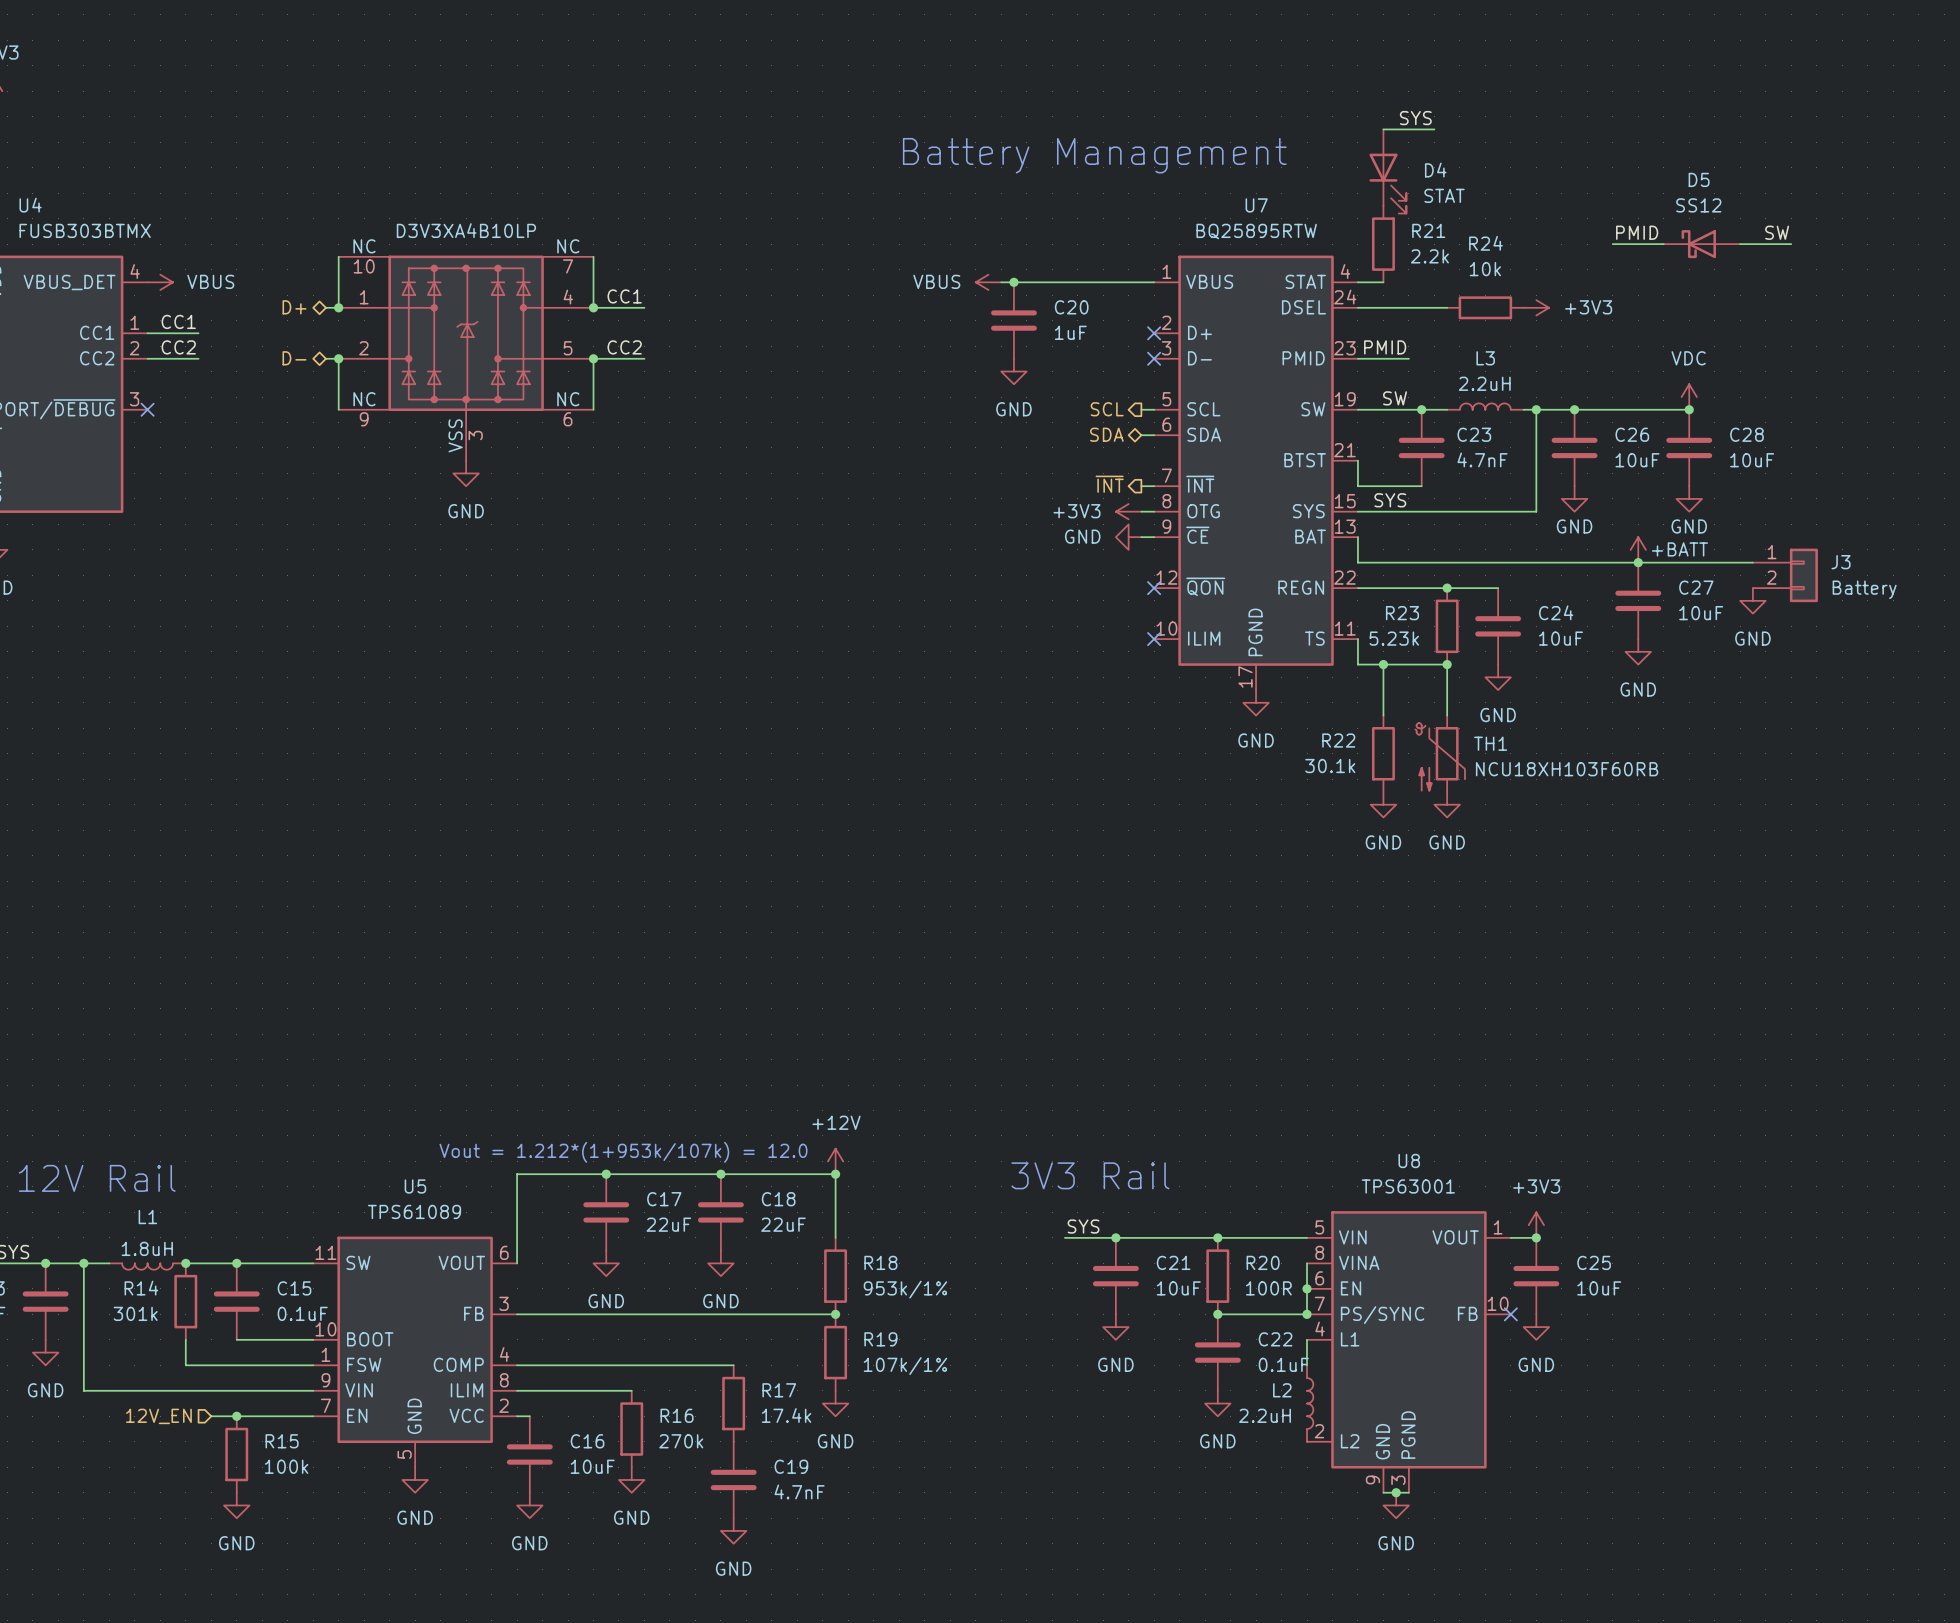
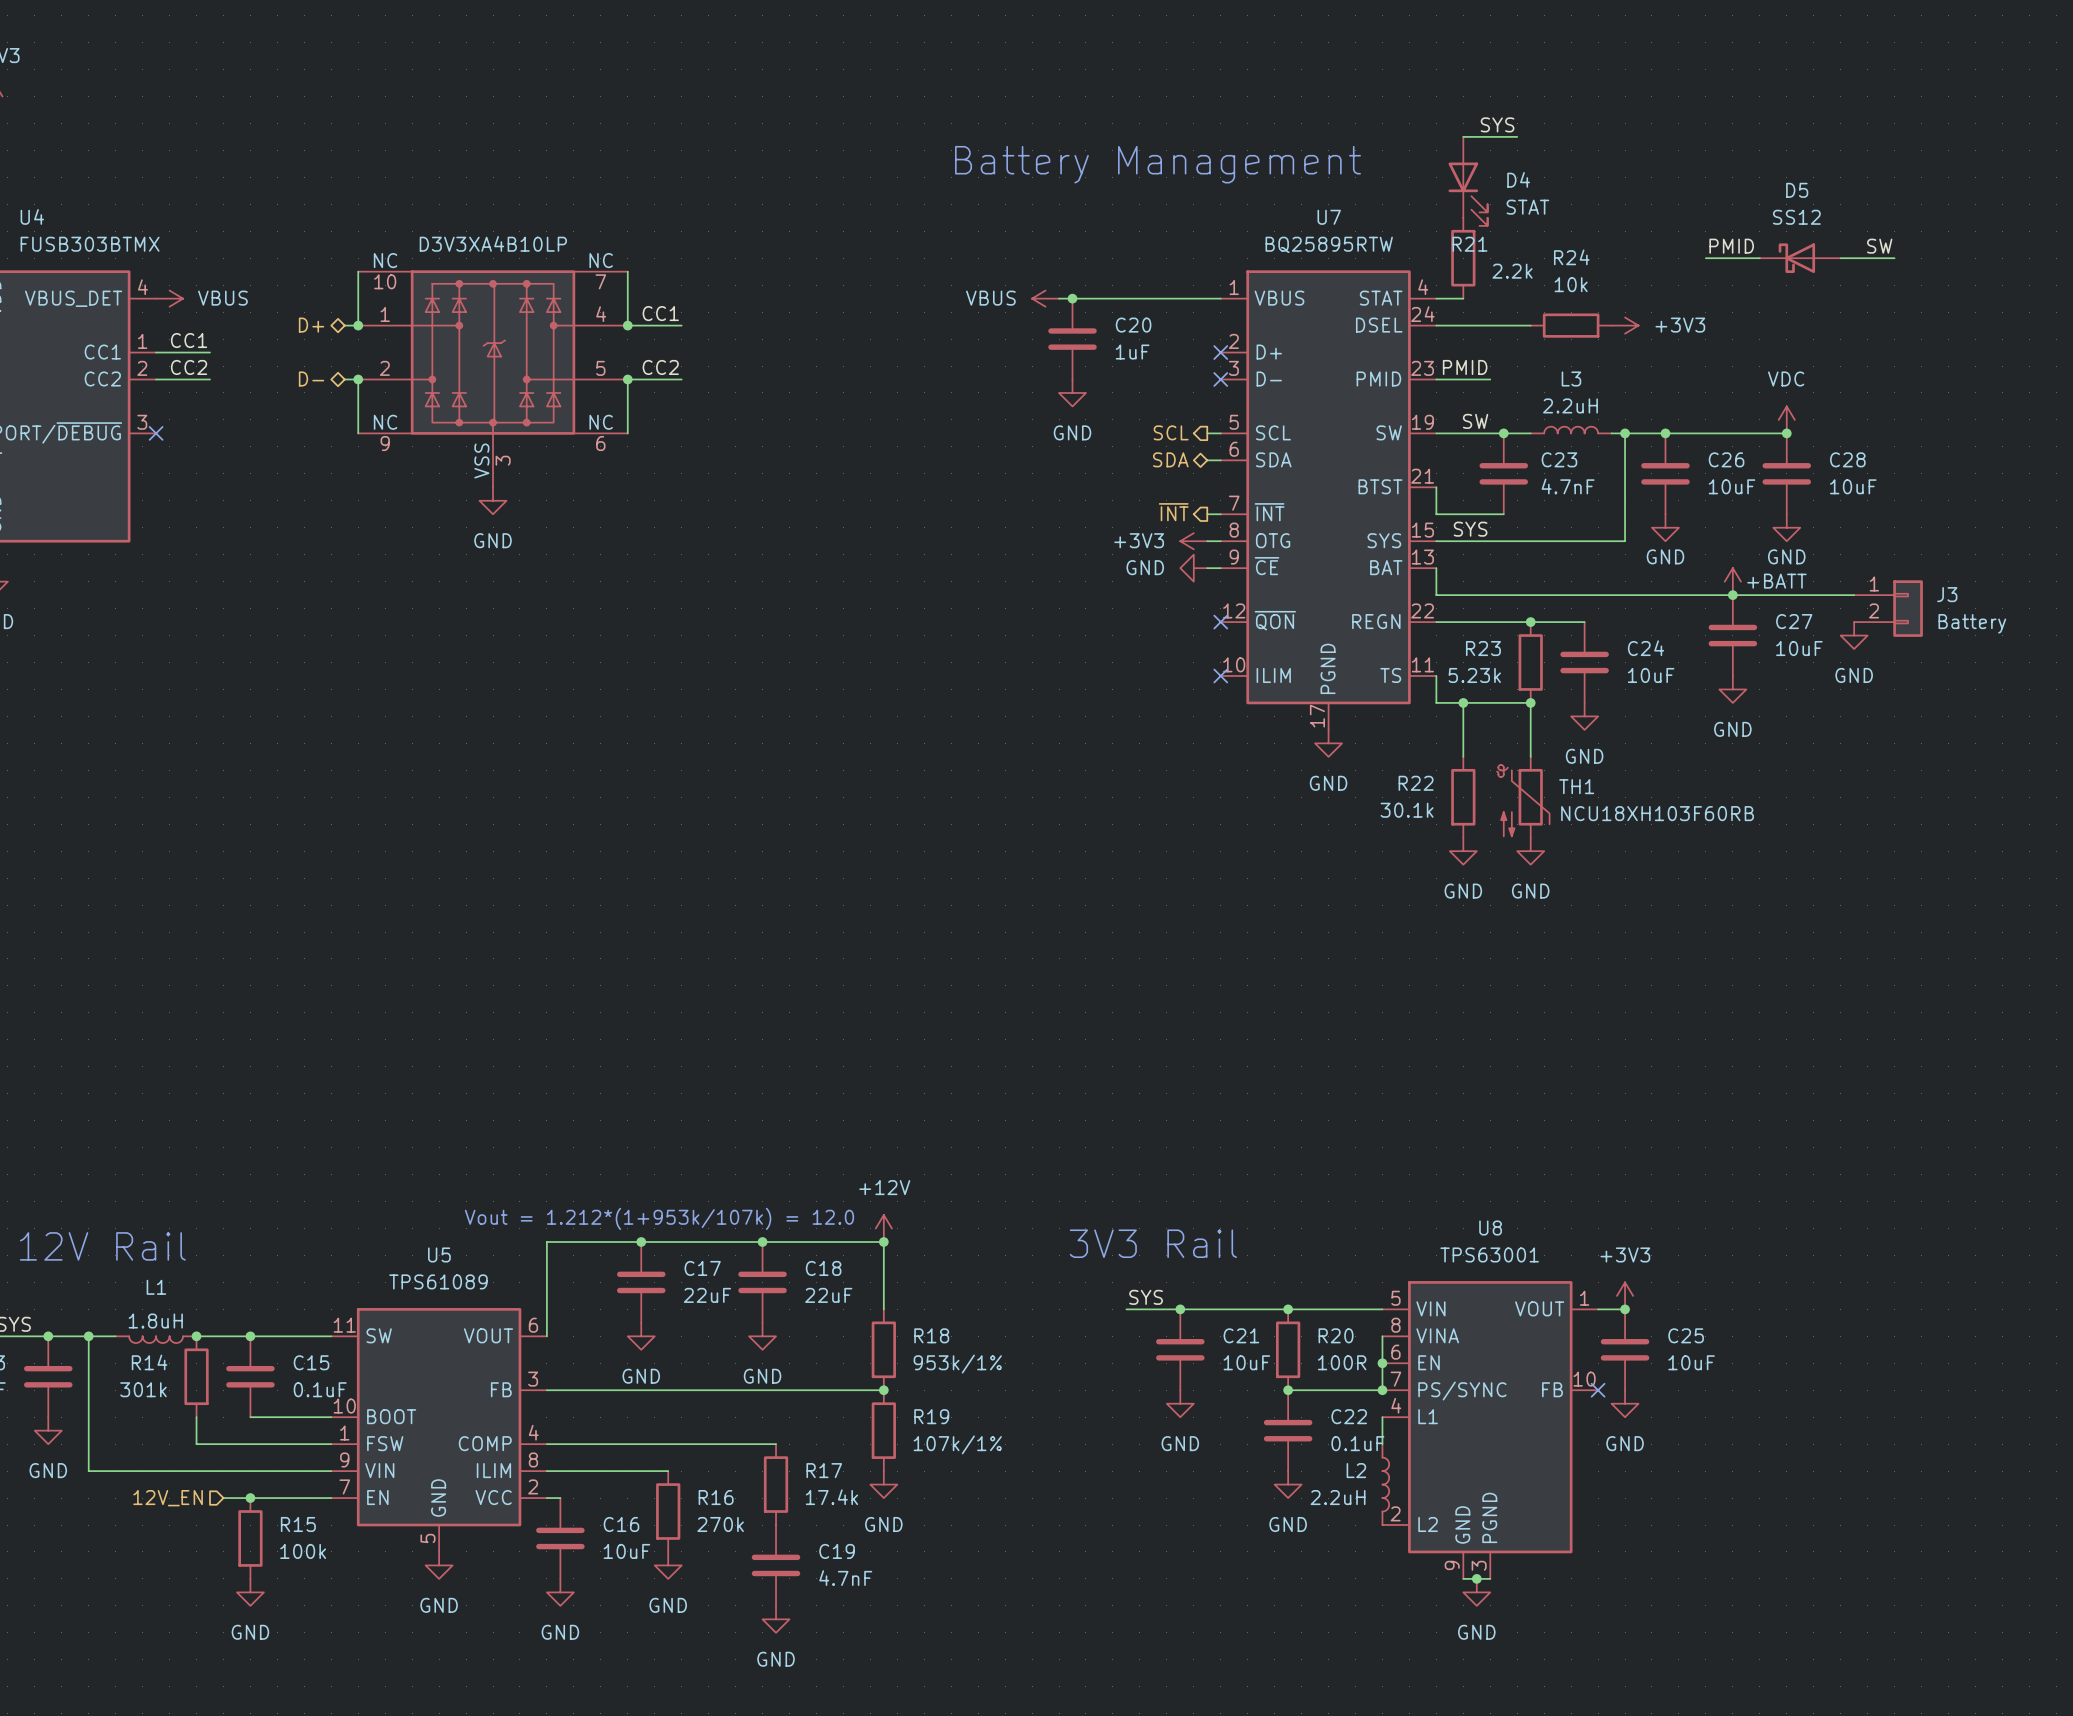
R21 name position: R21 (1428, 230) -> R21 (1469, 244)

